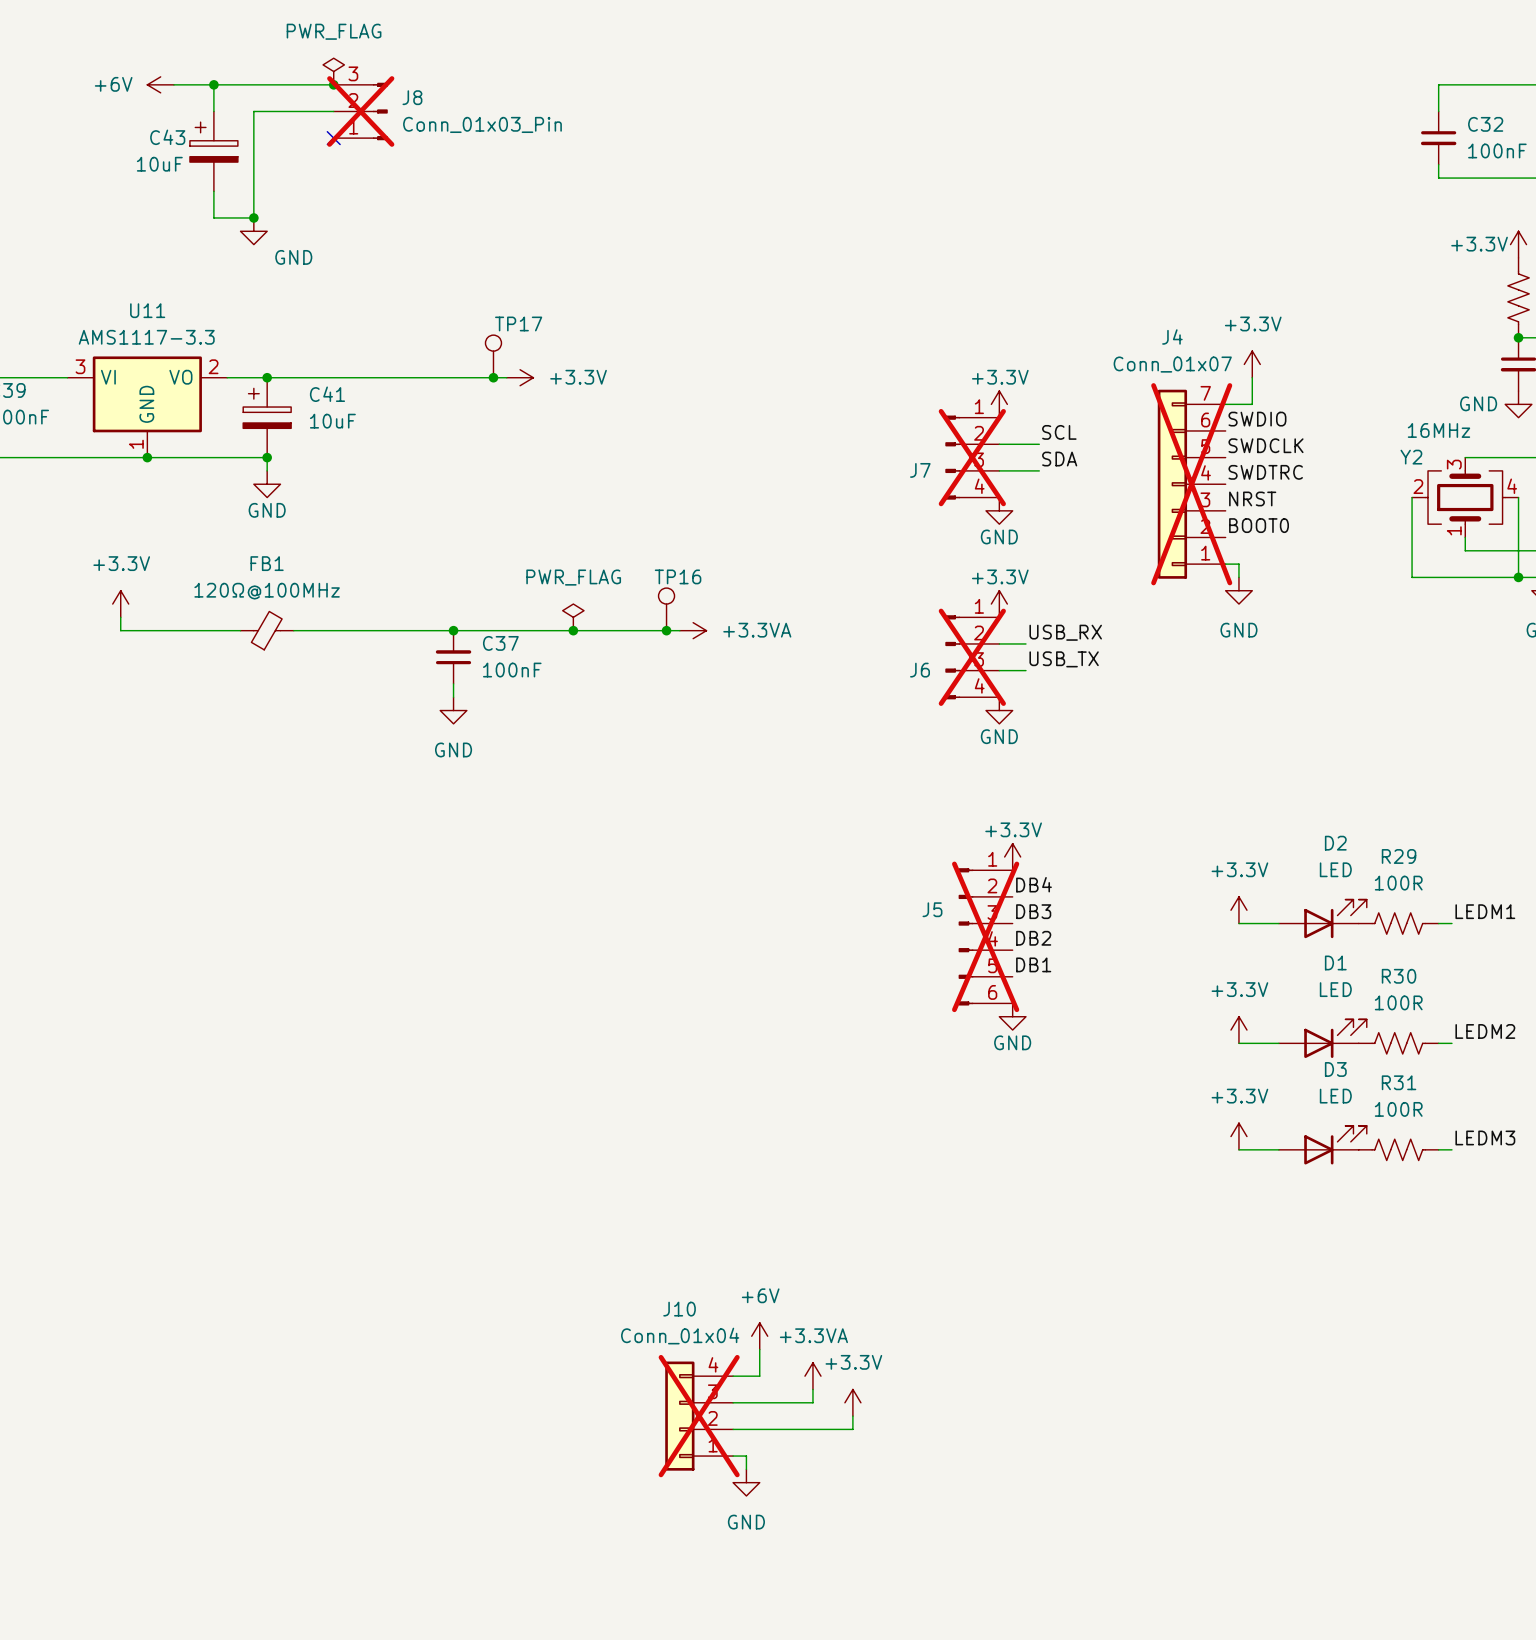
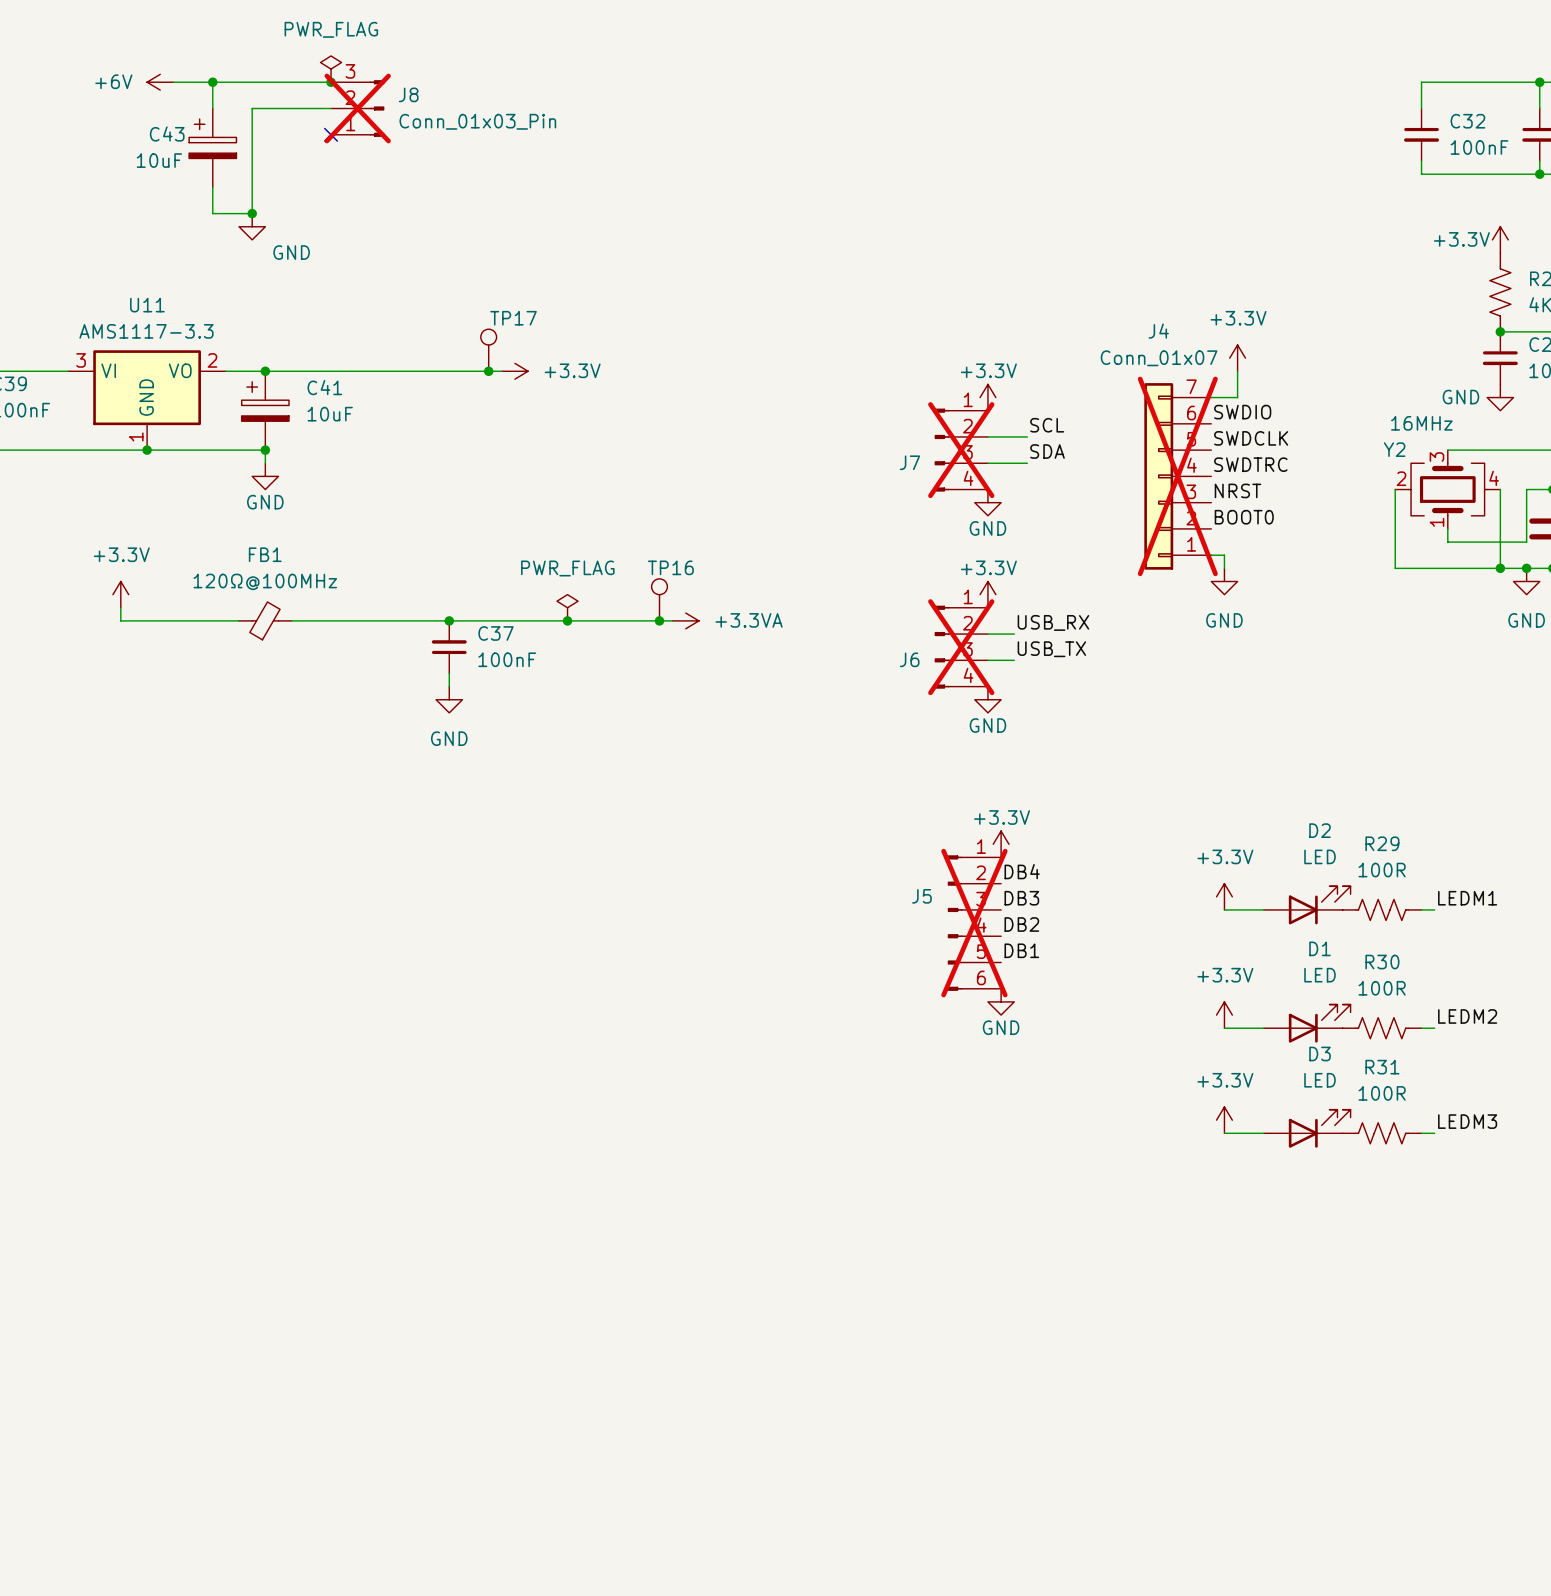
power symbol: +6V (759, 1336) -> none
wire: (759, 1349) (759, 1376) (733, 1376) -> none
power symbol: +3.3VA (812, 1376) -> none
wire: (812, 1389) (812, 1402) (733, 1402) -> none
power symbol: +3.3V (852, 1402) -> none
J10: Conn_01x04 (699, 1416) -> none
wire: (852, 1416) (852, 1429) (733, 1429) -> none
wire: (733, 1456) (746, 1456) (746, 1469) -> none
power symbol: GND (746, 1482) -> none

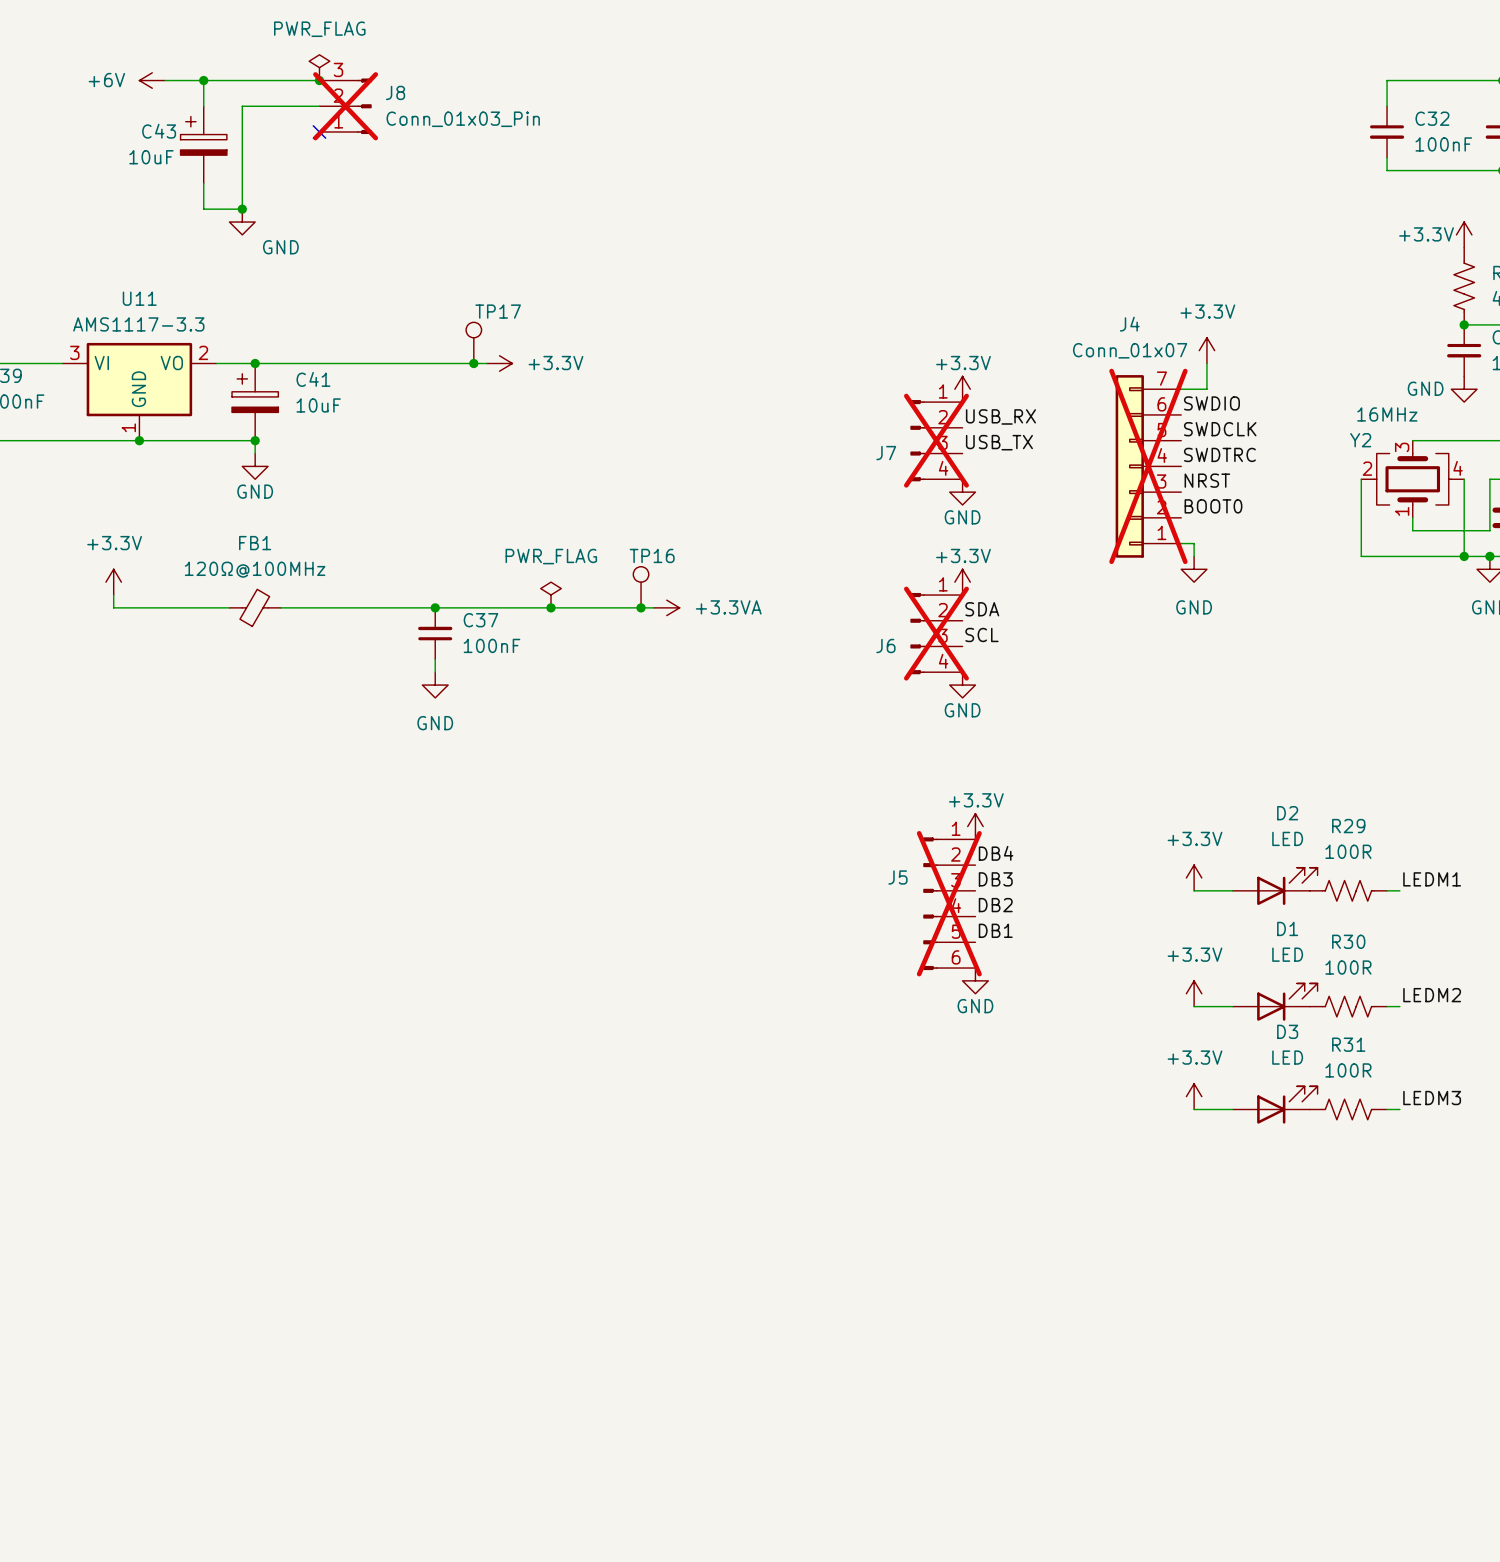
label position: SCL (1047, 425) -> SCL (981, 634)
wire: (987, 436) (1027, 436) -> none
label position: SDA (1047, 451) -> SDA (982, 609)
wire: (987, 463) (1027, 463) -> none
label position: USB_RX (1053, 622) -> USB_RX (1000, 416)
wire: (987, 634) (1014, 634) -> none
label position: USB_TX (1051, 649) -> USB_TX (999, 442)
wire: (987, 660) (1014, 660) -> none

